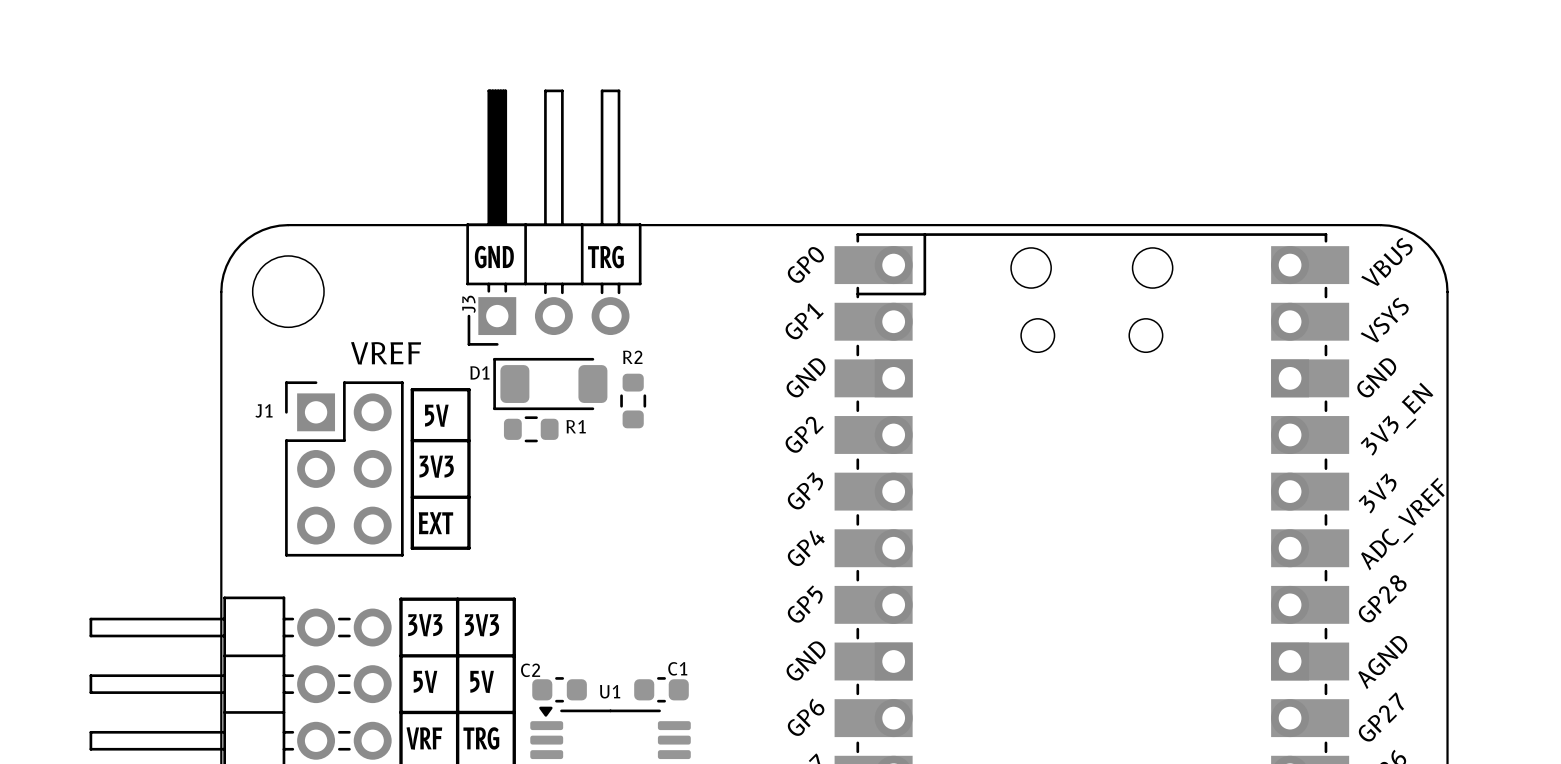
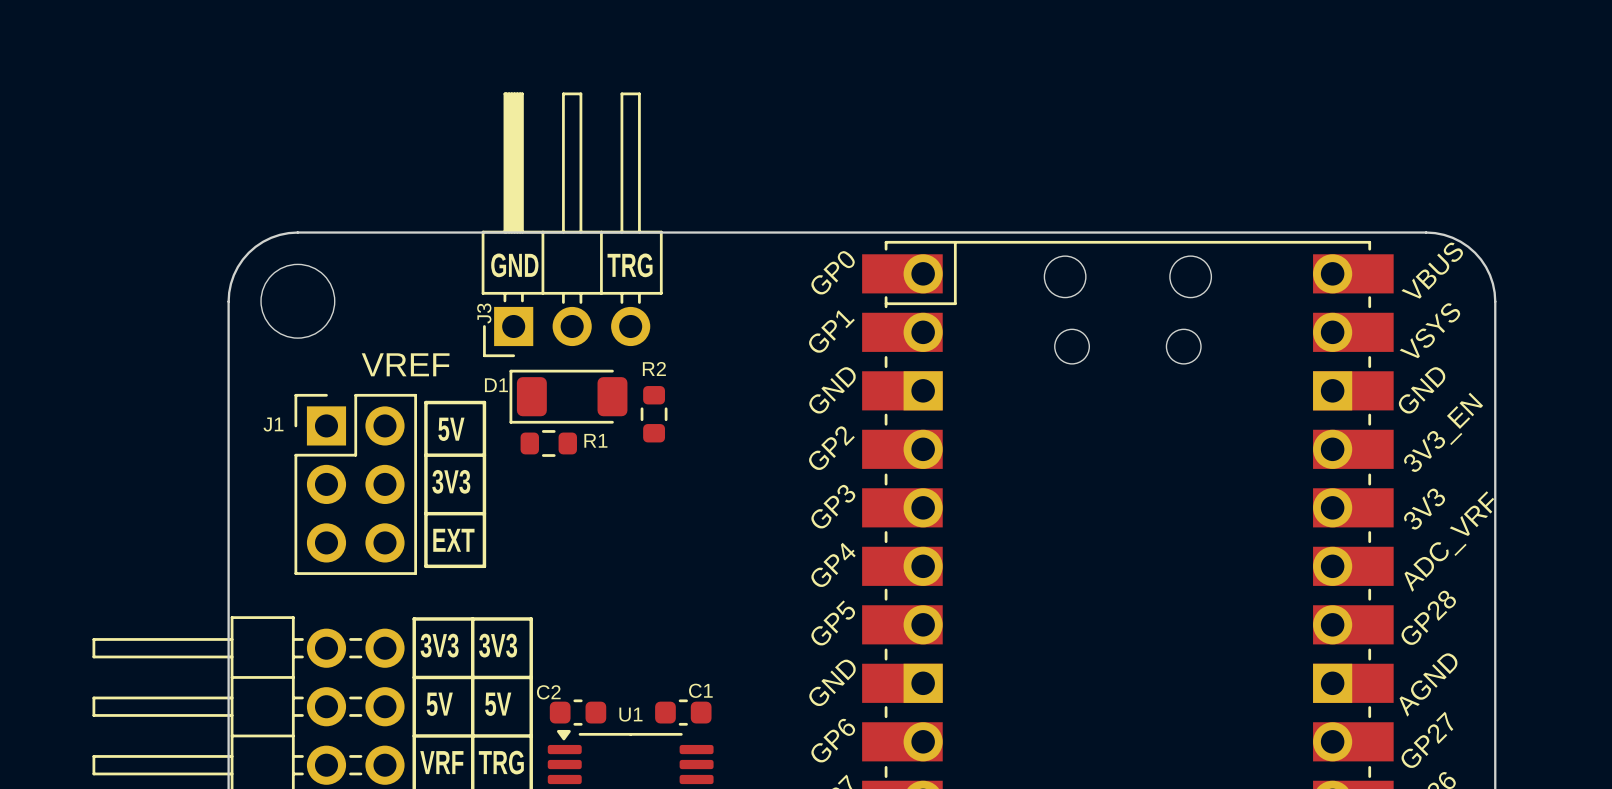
part text: ADC_VREF (1402, 523) -> ADC_VRF (1449, 541)

